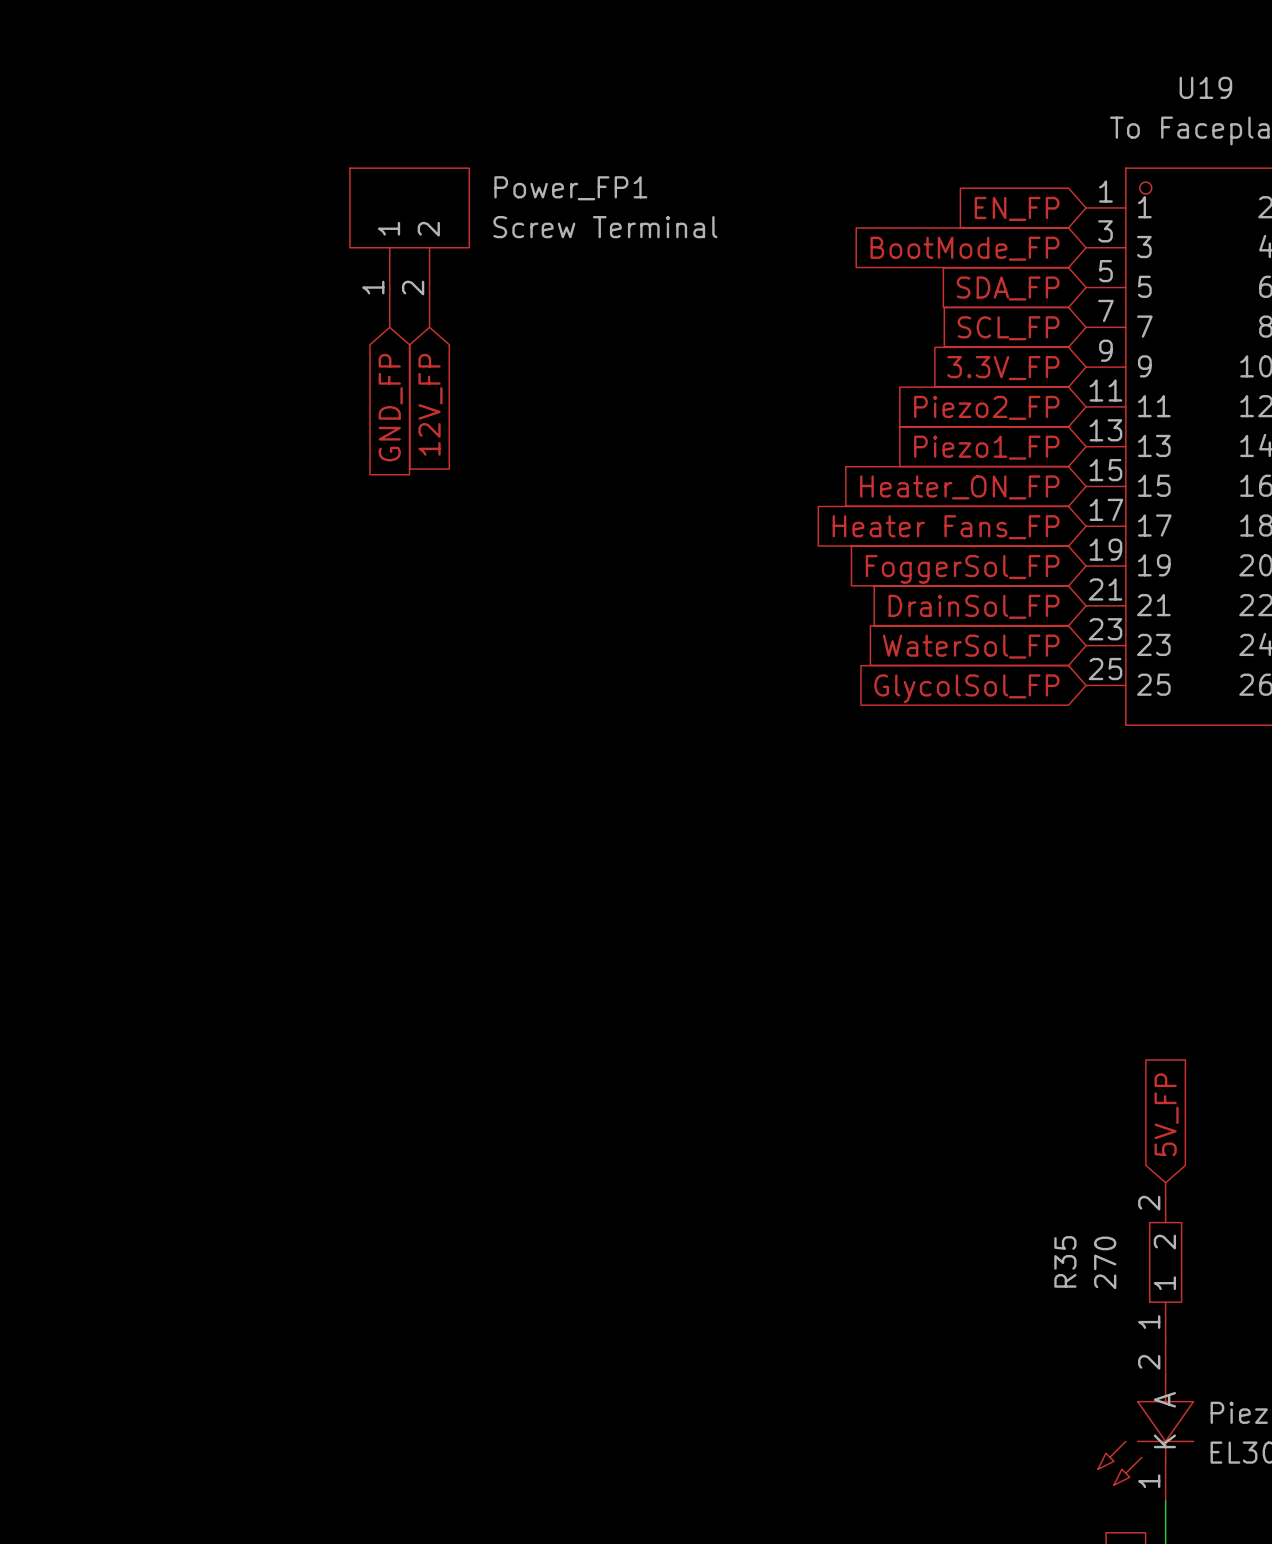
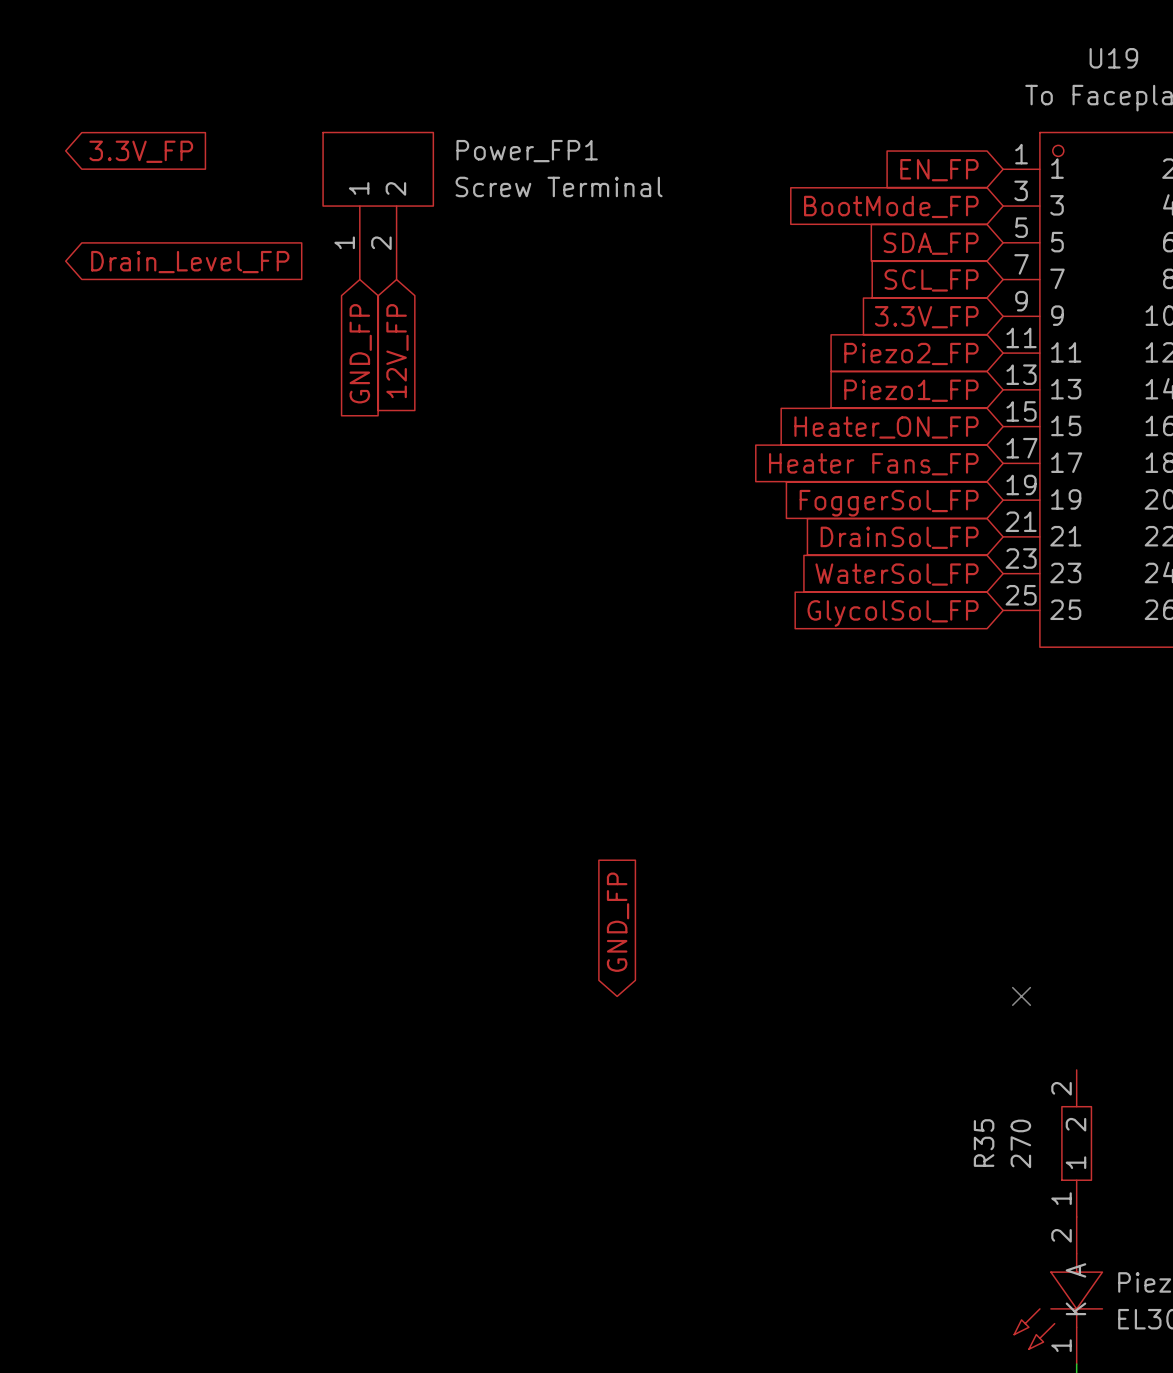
global label: none -> 3.3V_FP (141, 151)
global label: none -> Drain_Level_FP (190, 262)
global label: none -> GND_FP (618, 922)
no-connect mark: none -> (1021, 996)
global label: 5V_FP (1166, 1114) -> none

